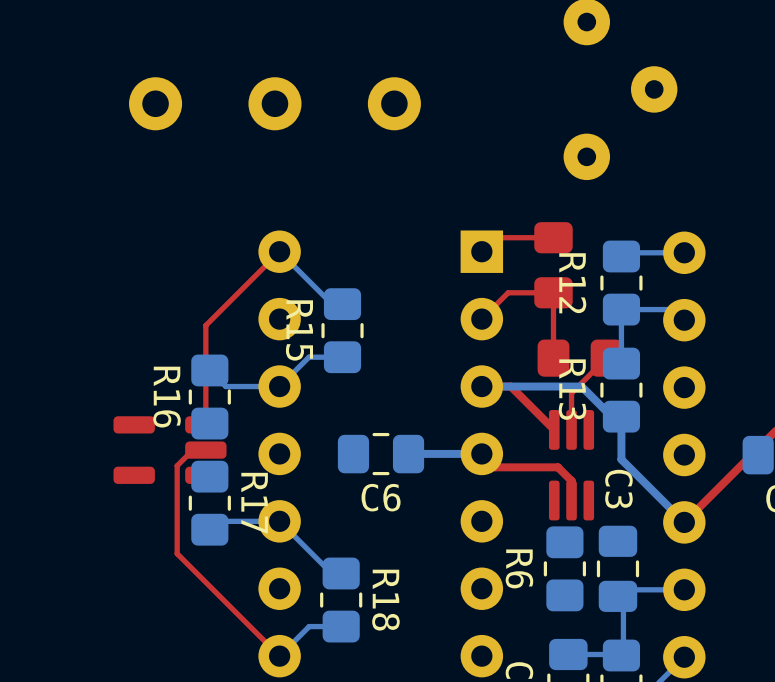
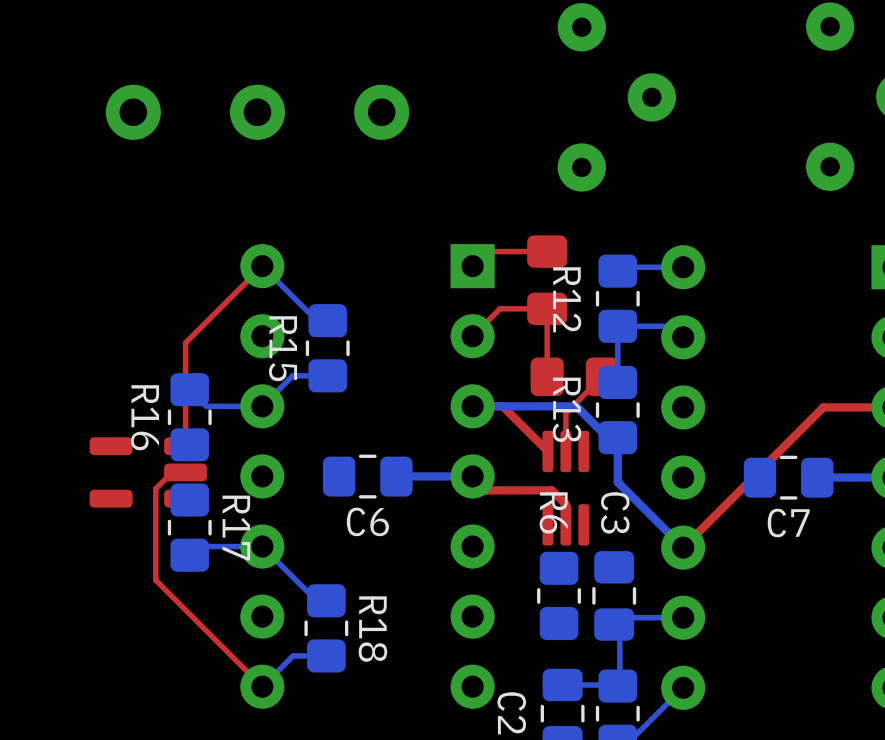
R6 name position: R6 (519, 568) -> R6 (553, 512)

